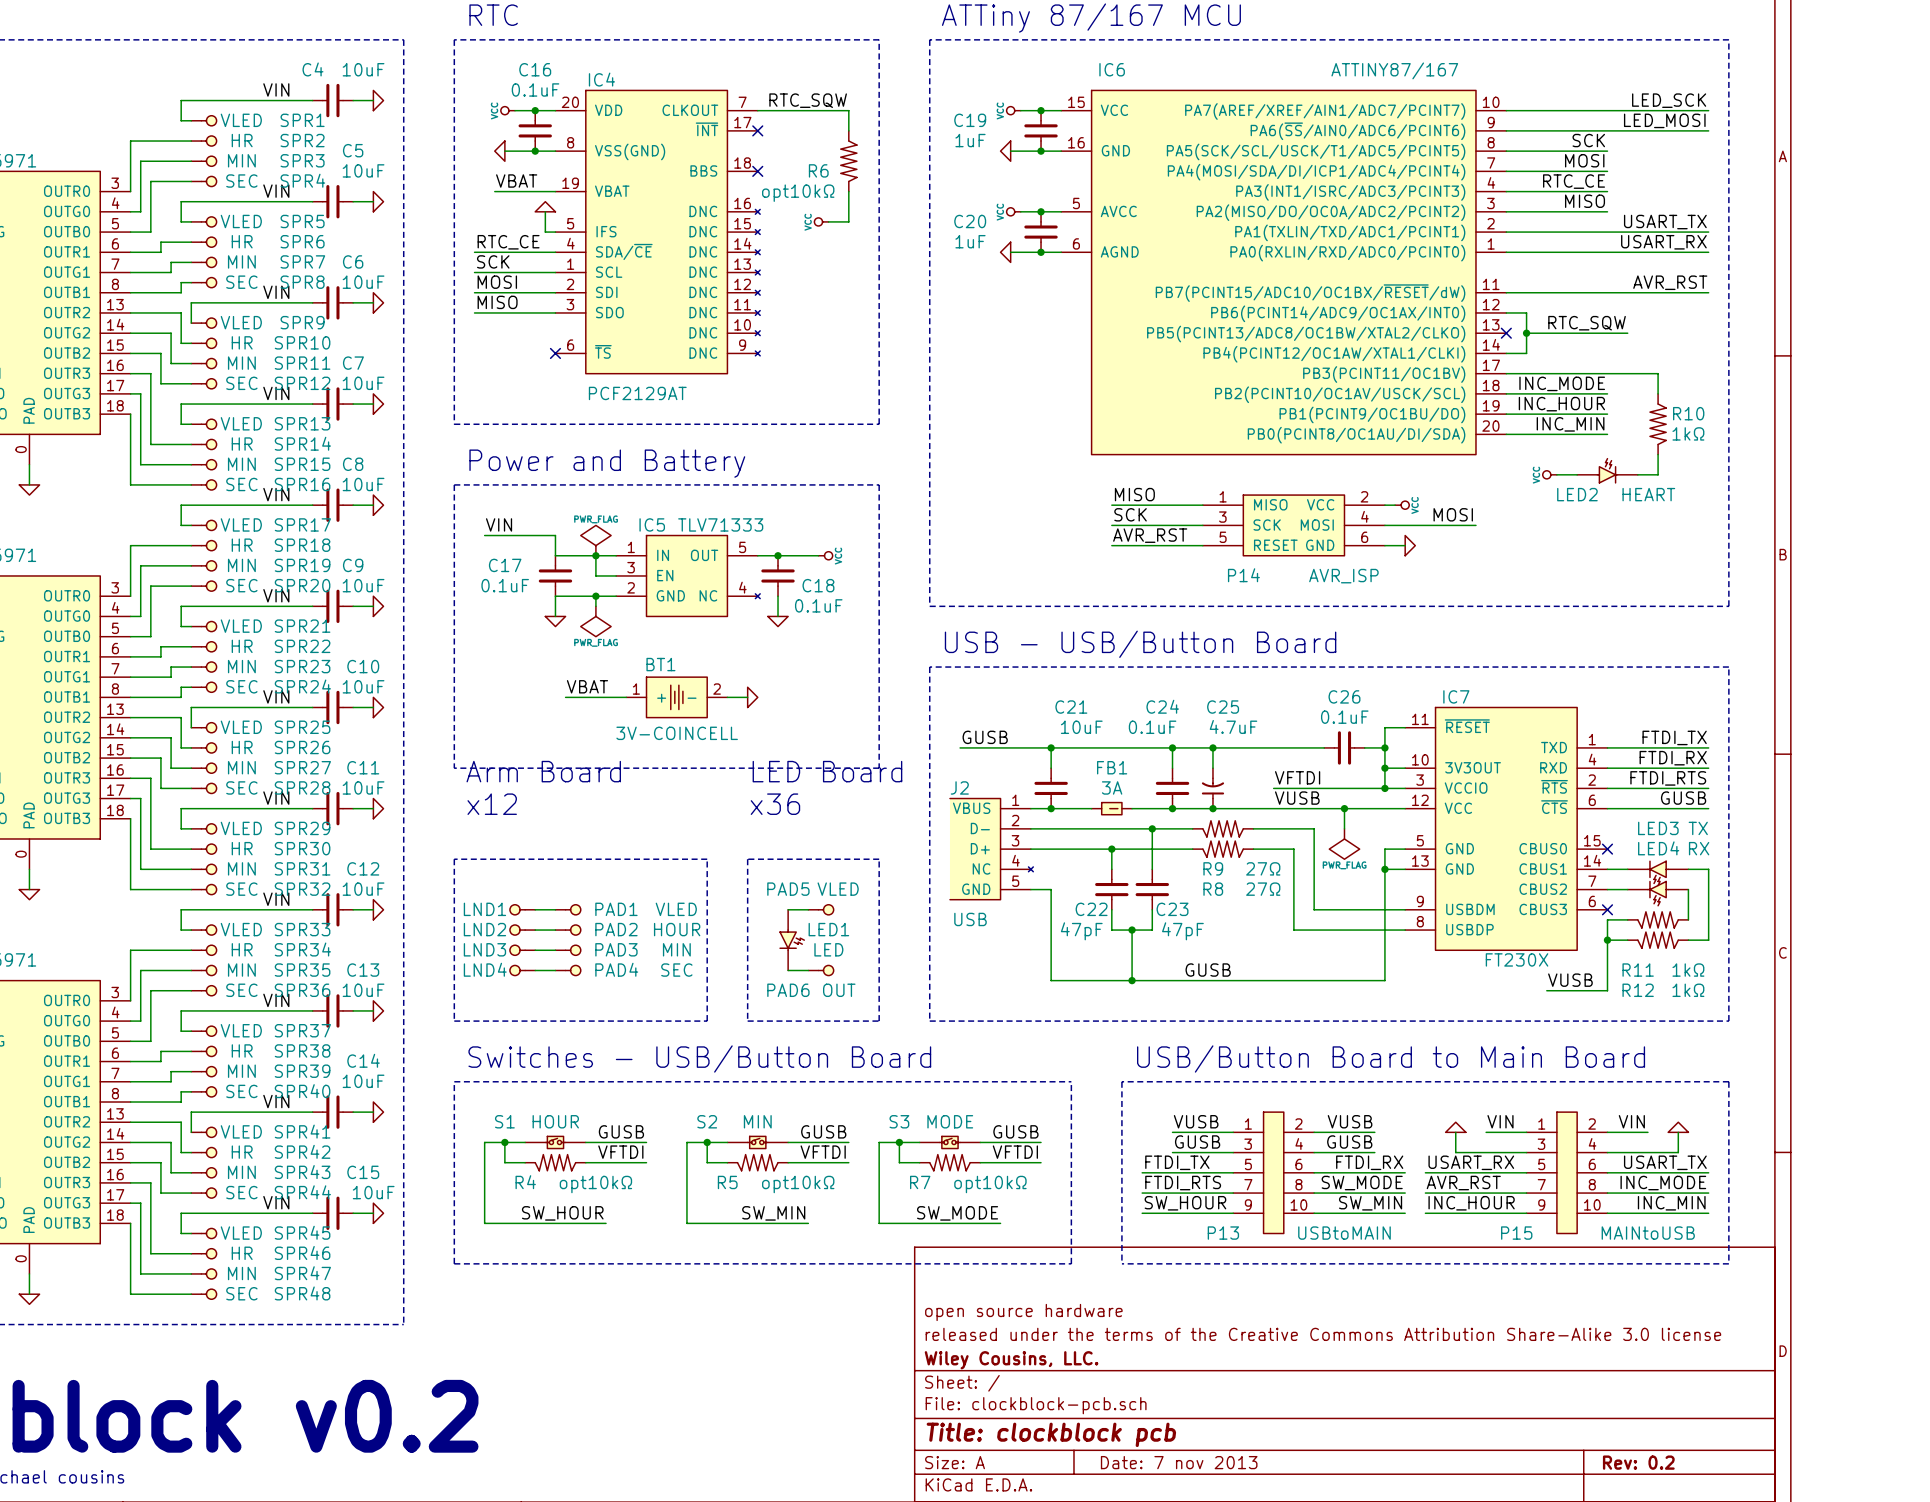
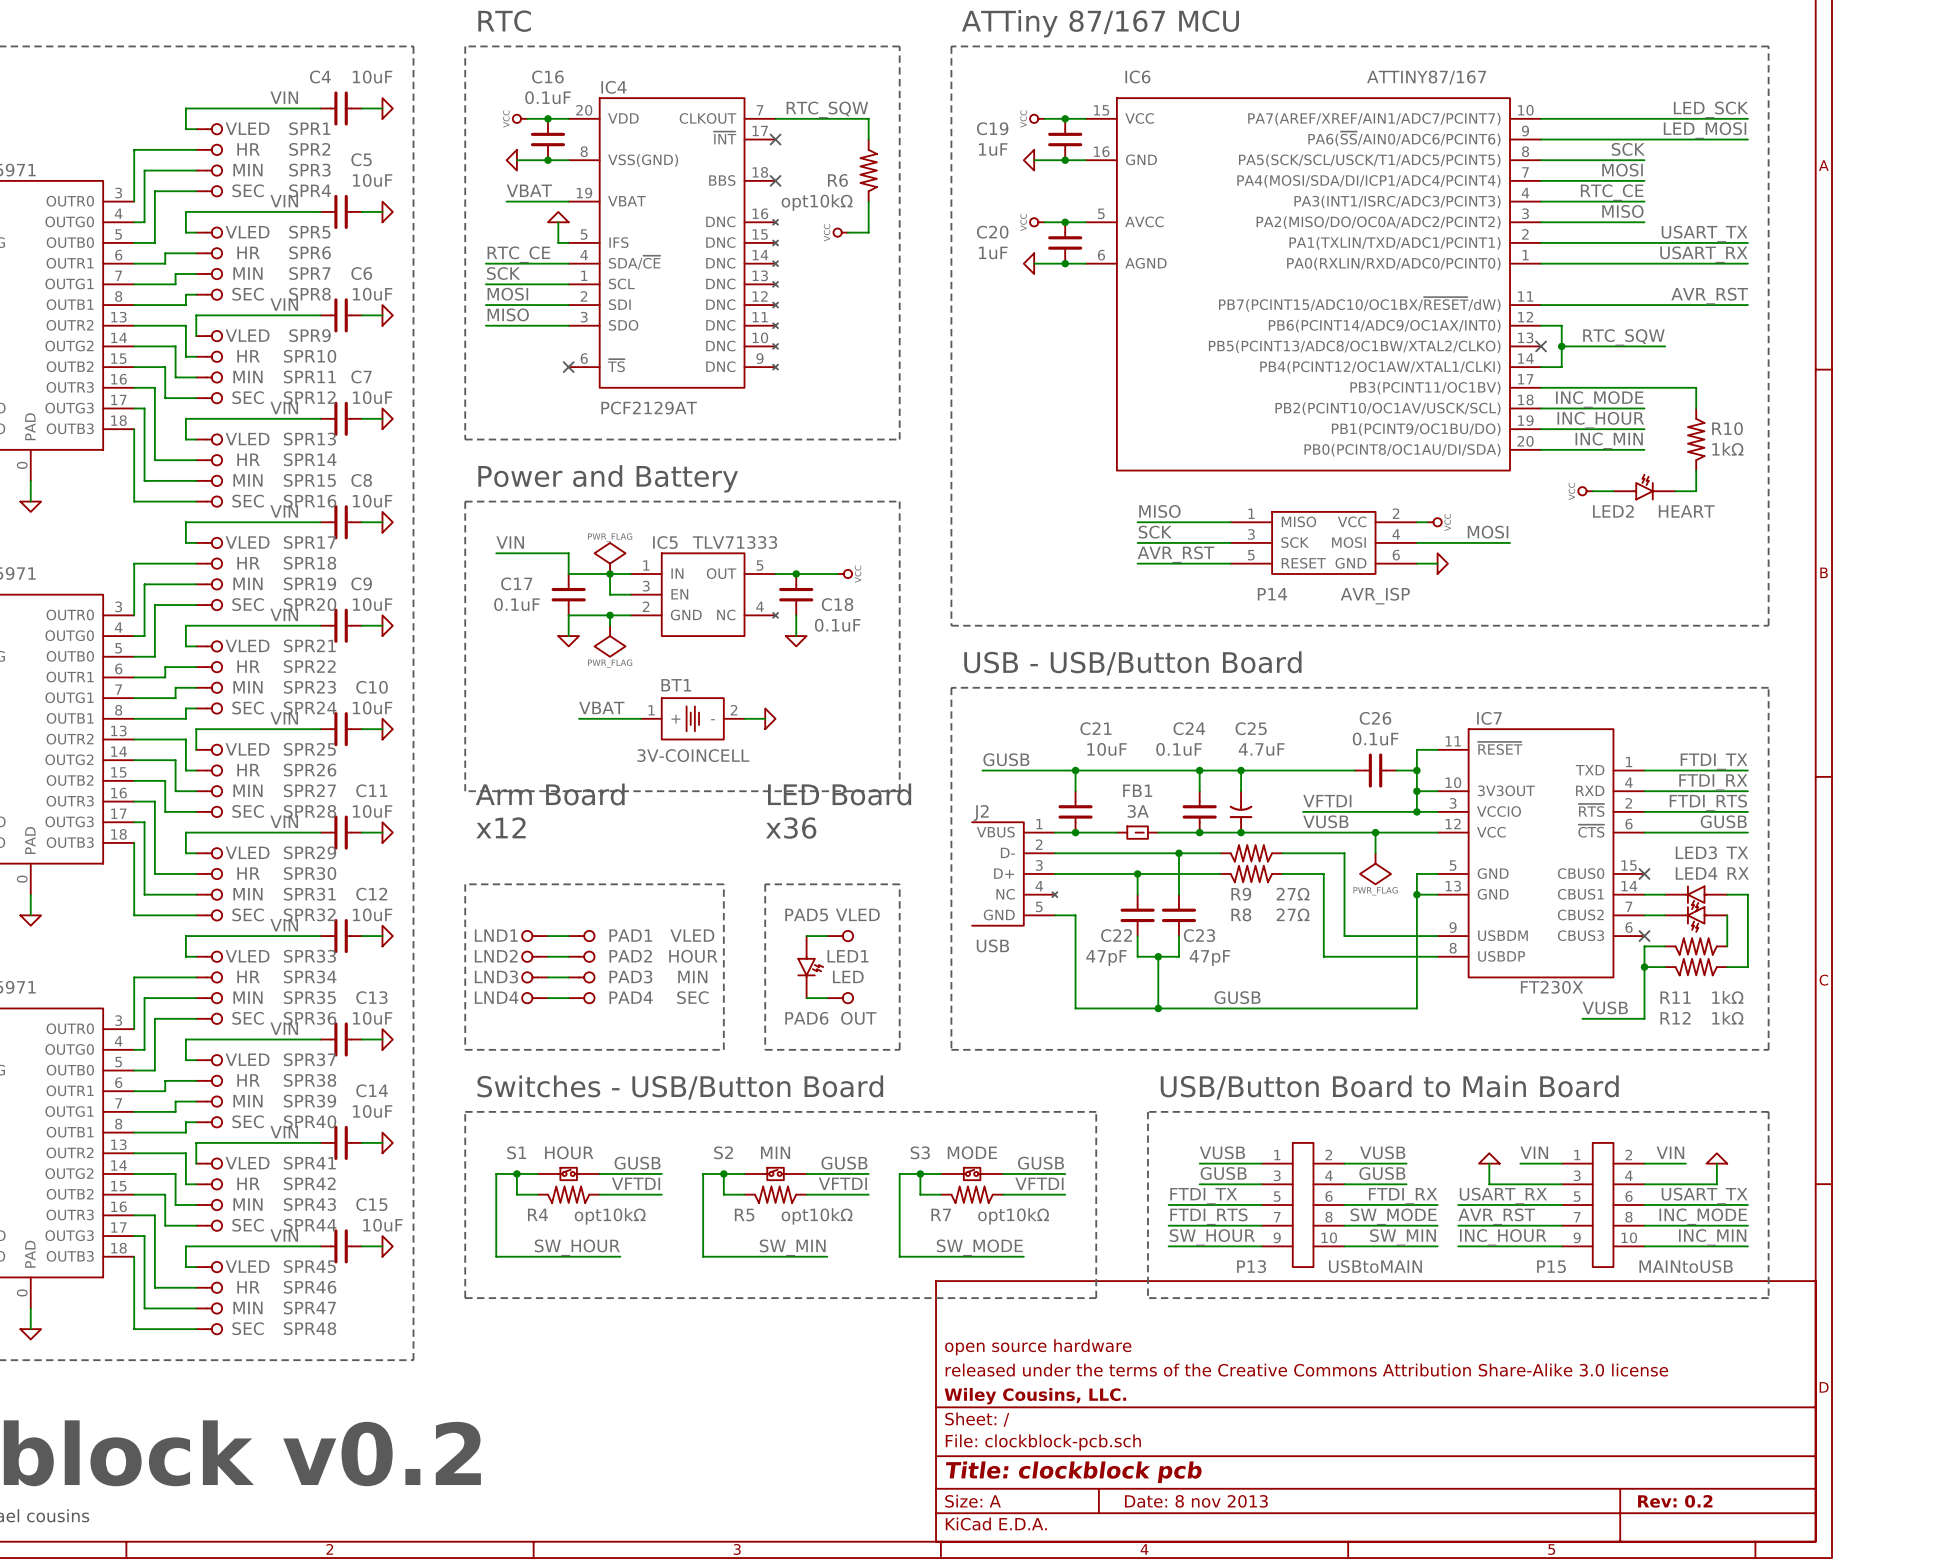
title block: Date: 7 nov 2013 (1179, 1462) -> Date: 8 nov 2013 (1196, 1501)

